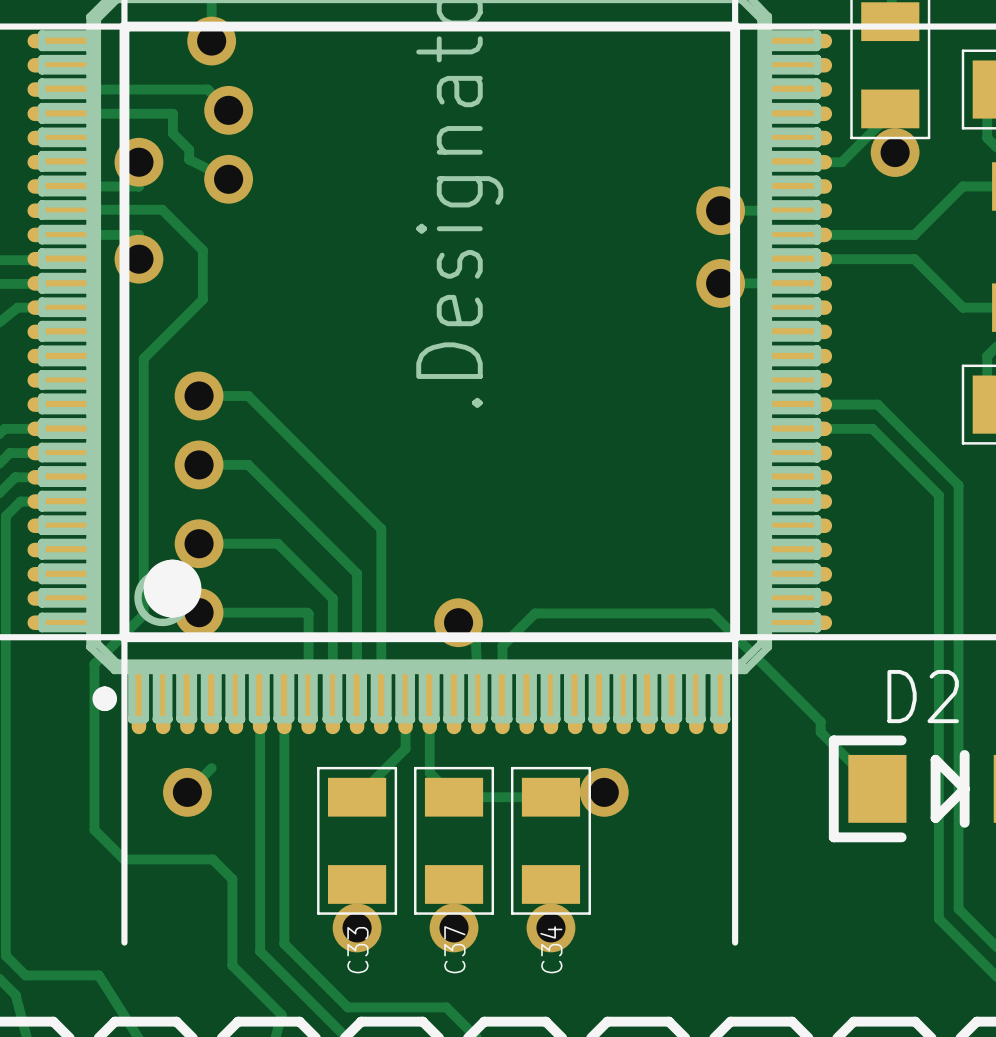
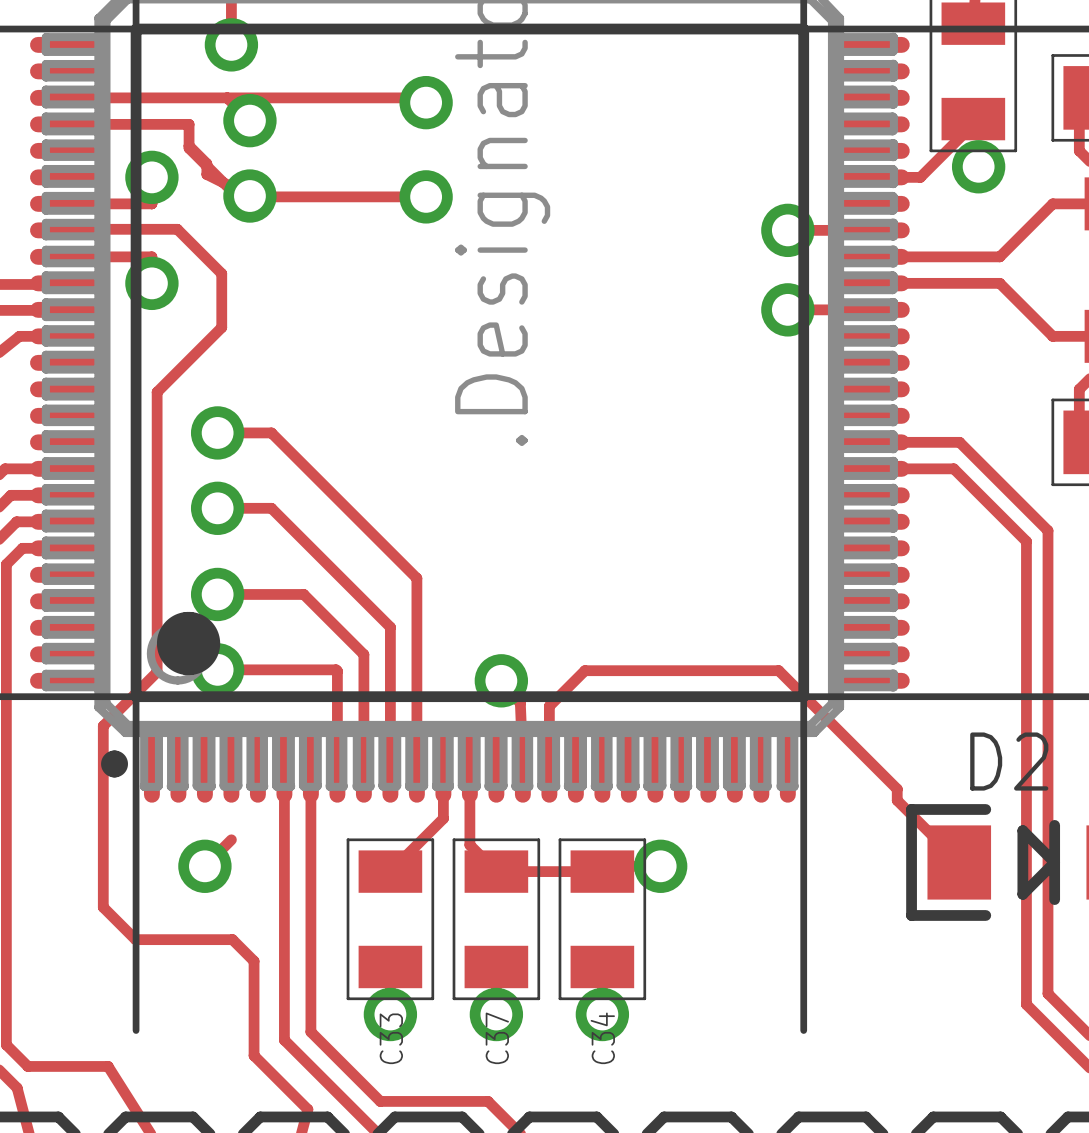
track: none -> (227, 97) (421, 97) (426, 102)
via: none -> (426, 102)
track: none -> (189, 145) (189, 148) (237, 196) (426, 196)
via: none -> (426, 196)

